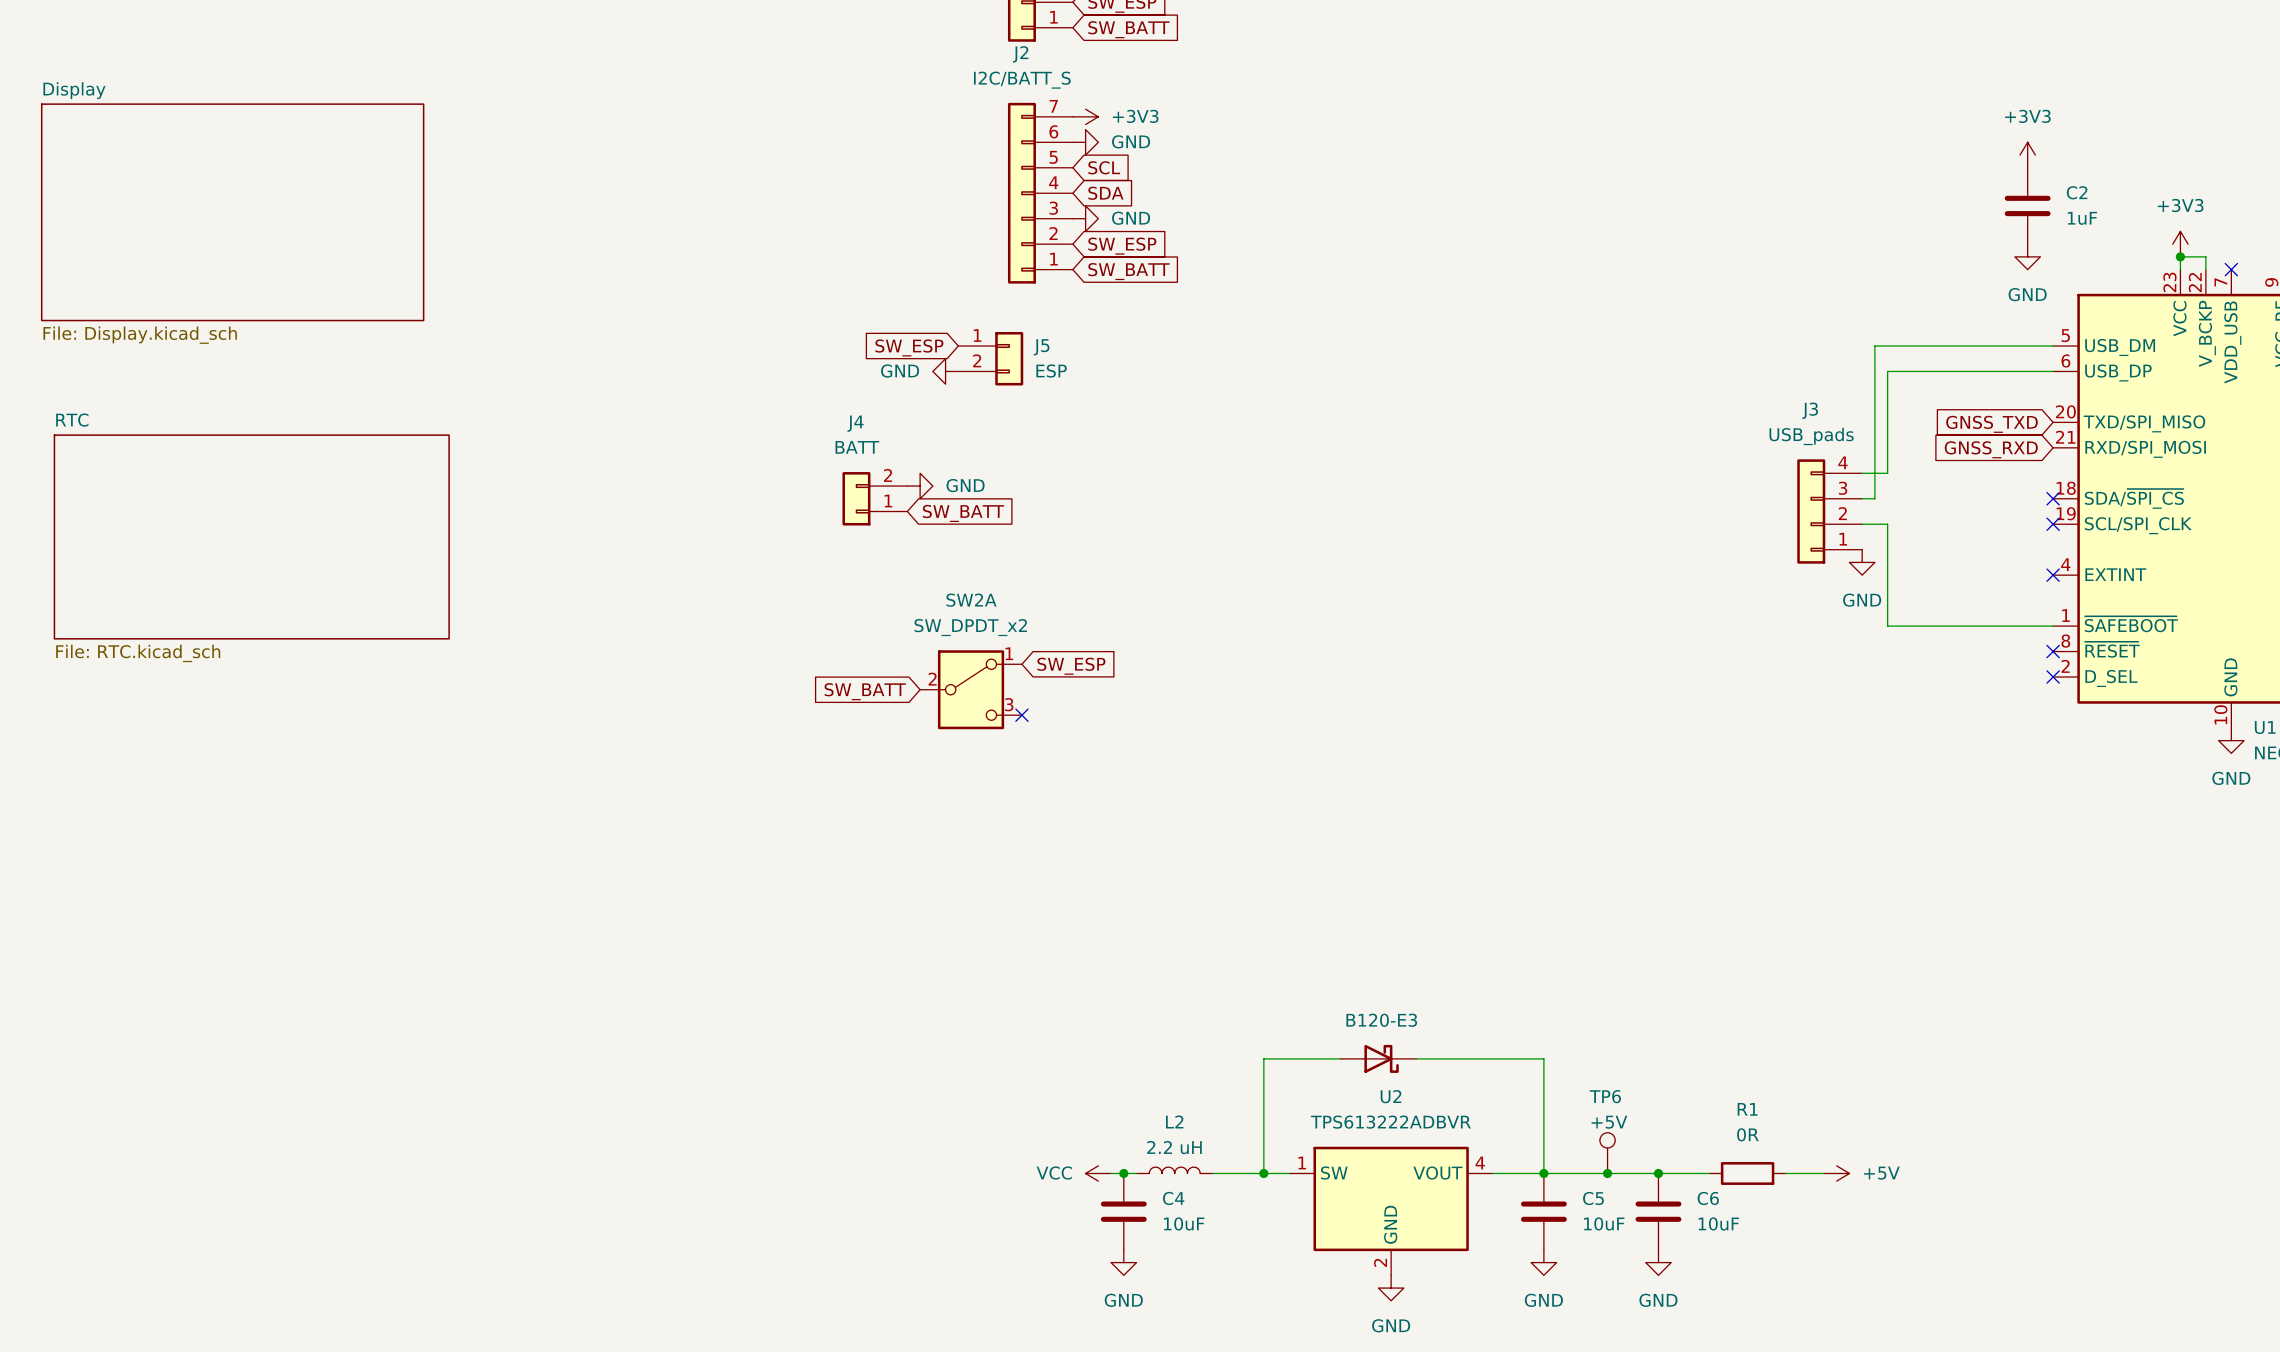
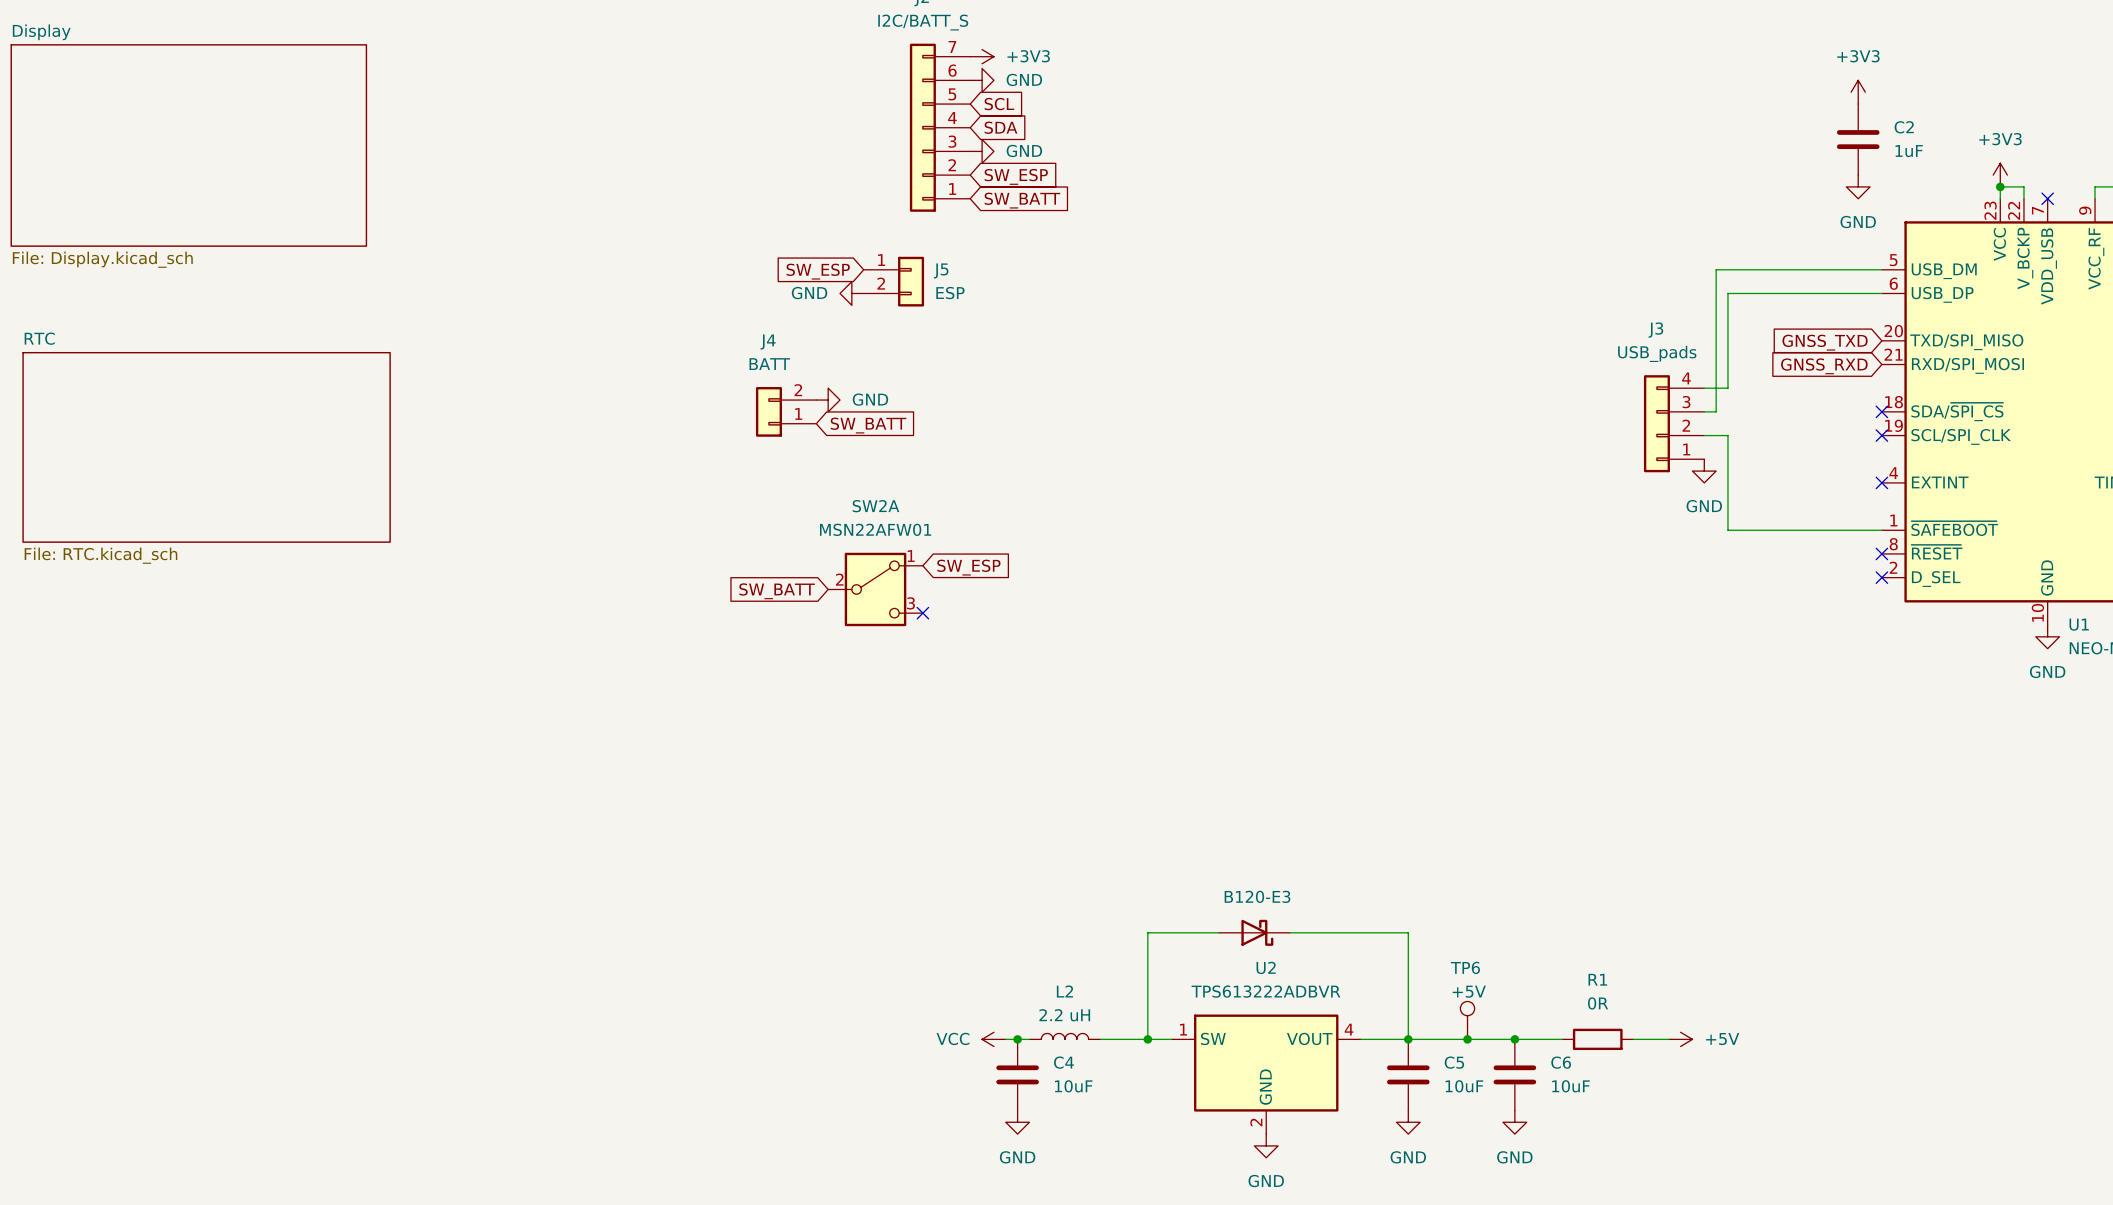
SW2A value: SW_DPDT_x2 (970, 627) -> MSN22AFW01 (875, 529)

